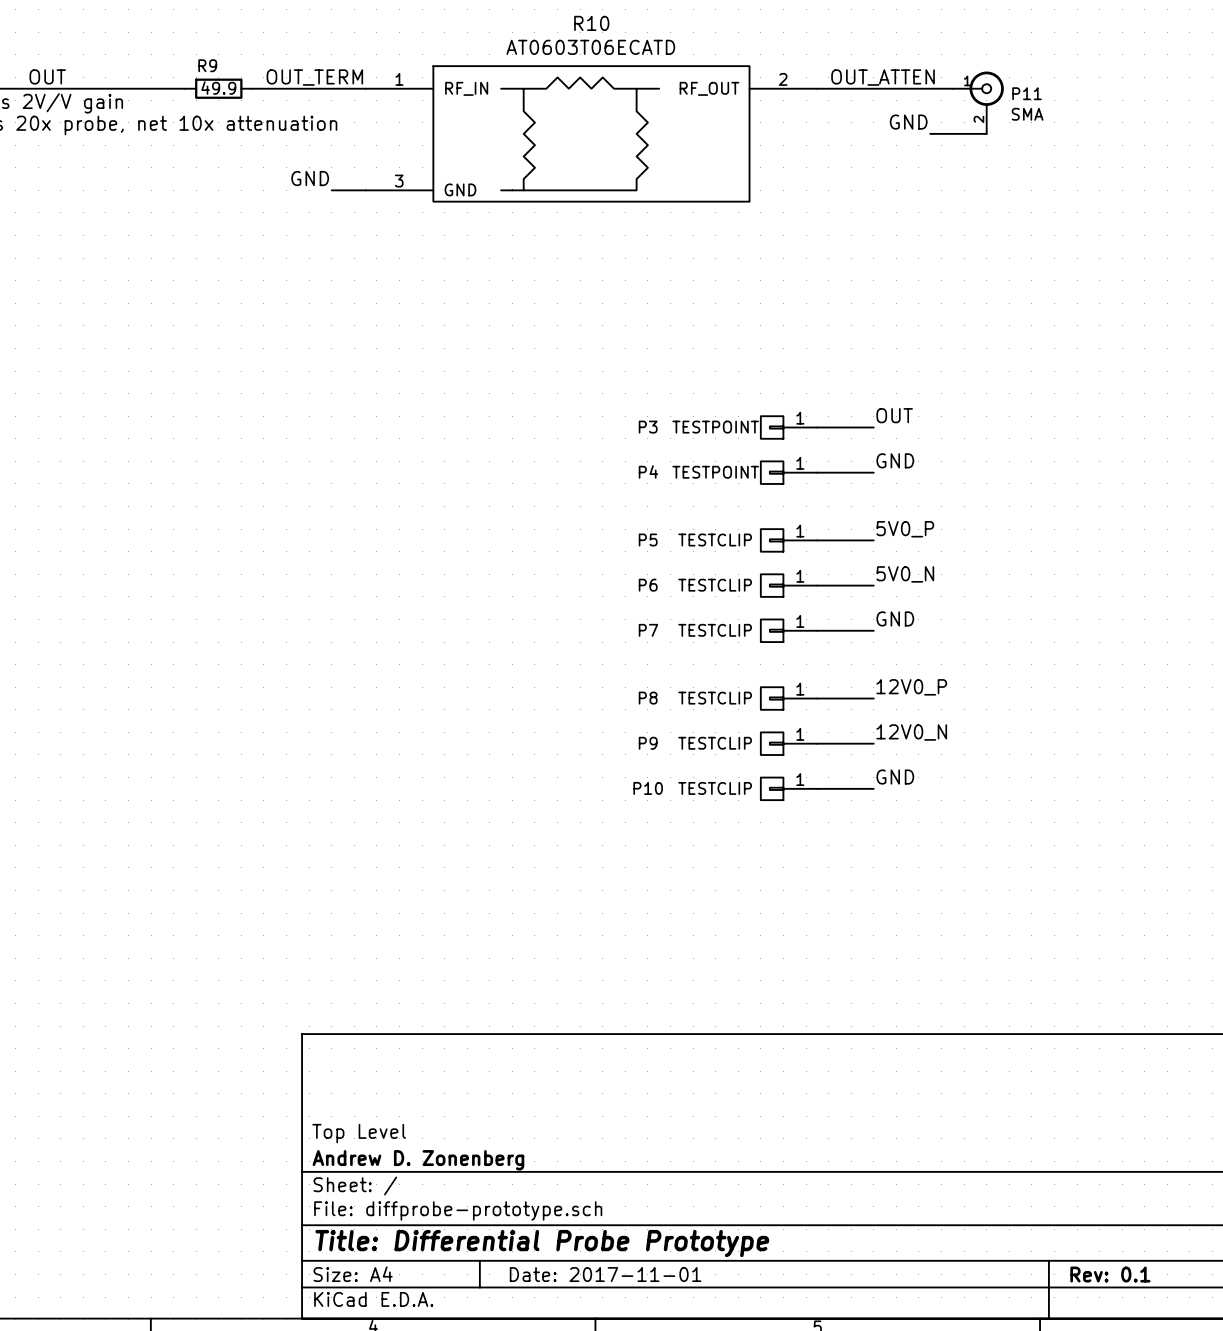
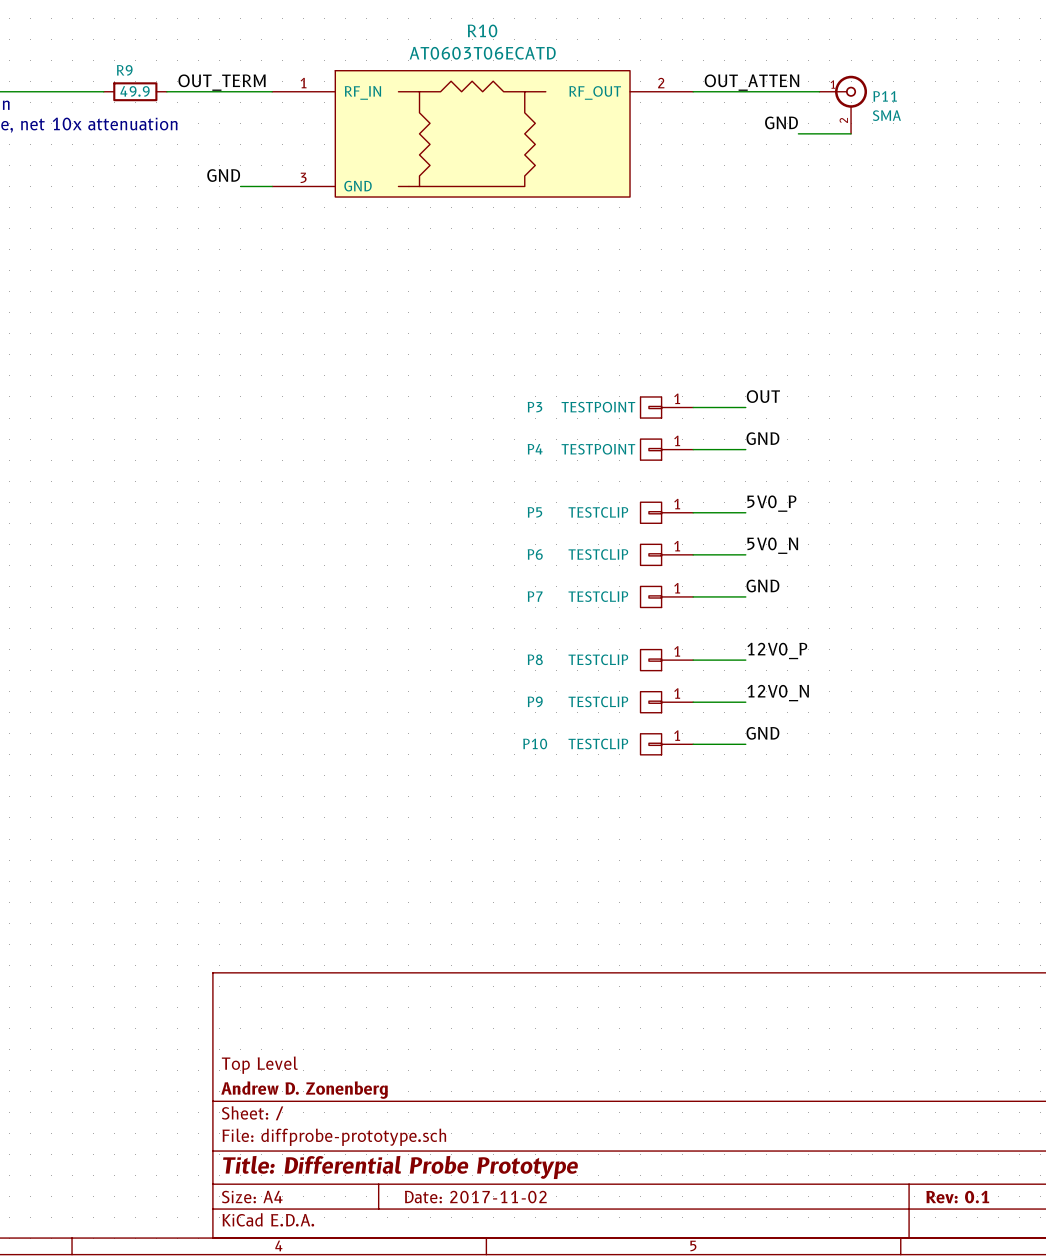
title block: Date: 2017-11-01 (605, 1274) -> Date: 2017-11-02 (475, 1197)

